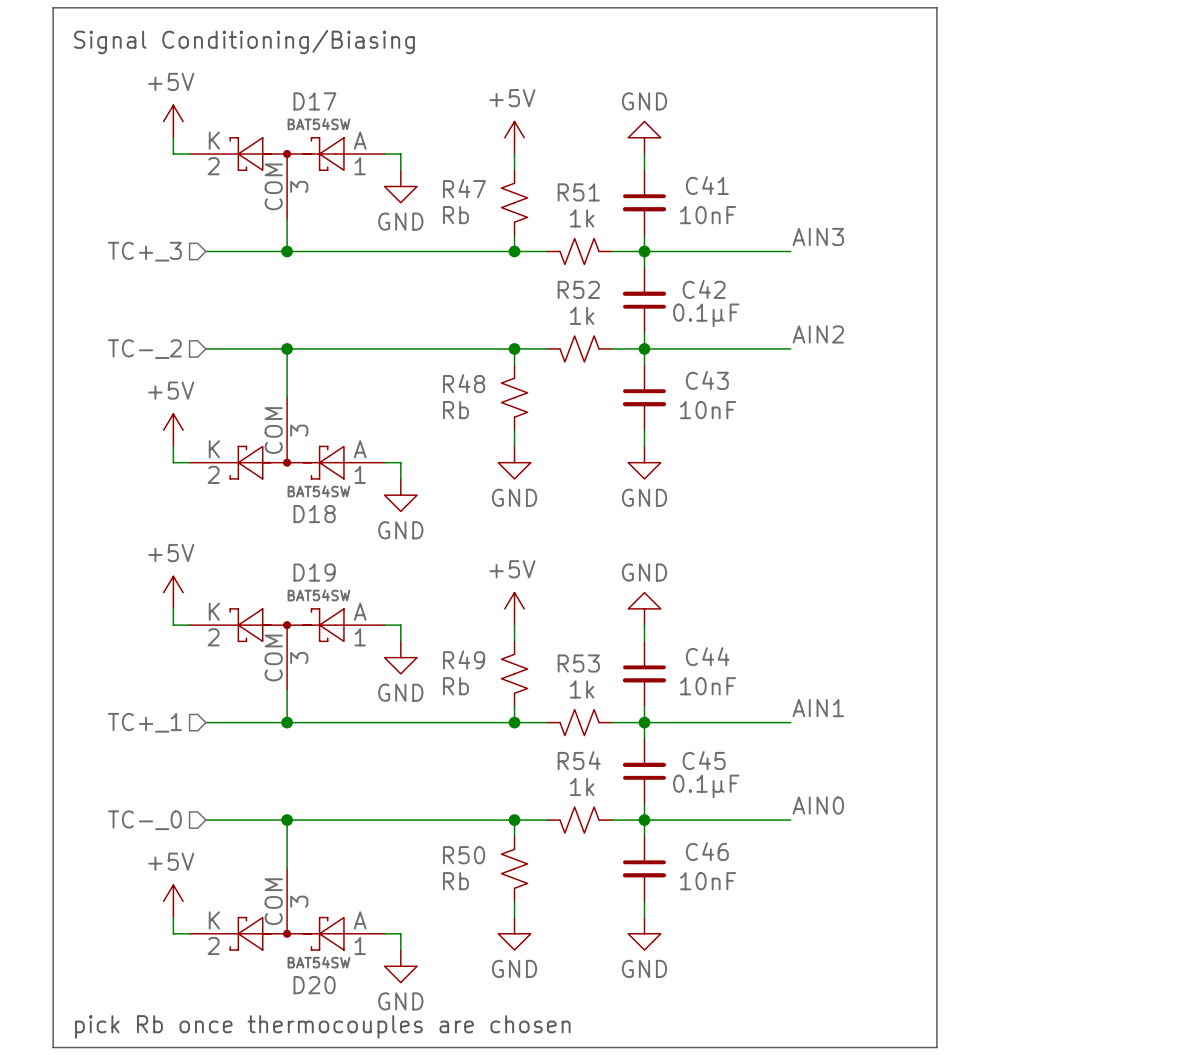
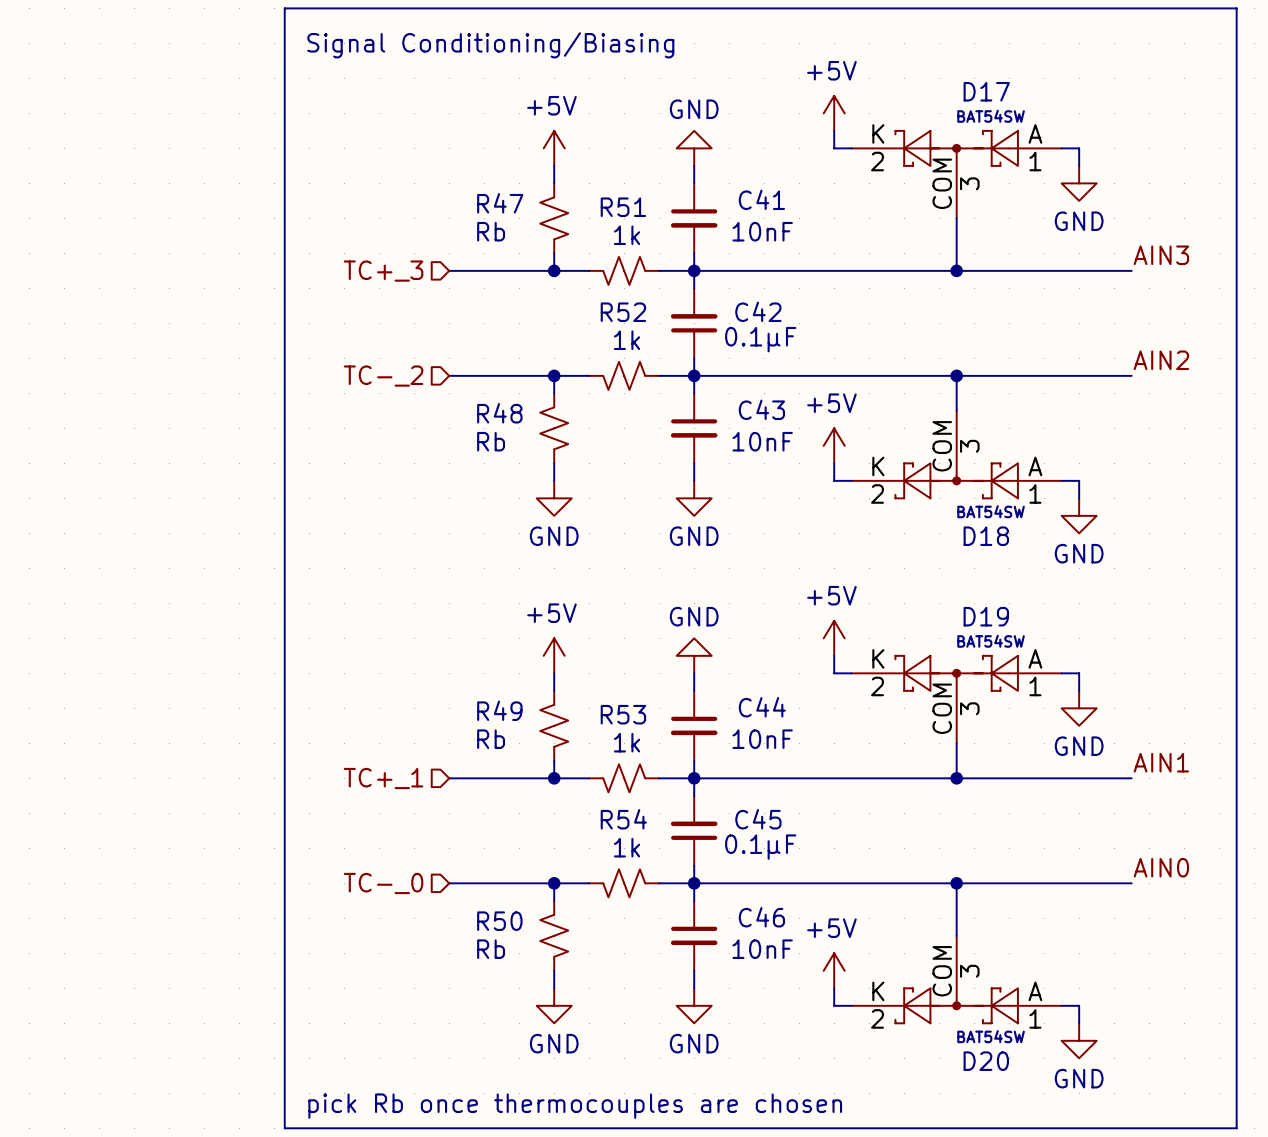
line: (264, 7) (53, 7) (53, 1047) (264, 1047) -> (284, 8) (284, 1128)
line: (936, 7) (936, 1047) -> (1009, 8) (1236, 8) (1236, 1128) (1009, 1128)
text position: Signal Conditioning/Biasing (244, 42) -> Signal Conditioning/Biasing (490, 45)
power symbol: none -> +5V (834, 113)
power symbol: +5V (173, 121) -> none
wire: none -> (834, 130) (834, 148) (851, 148)
wire: (173, 137) (173, 154) (189, 154) -> none
wire: none -> (1061, 148) (1079, 148) (1079, 165)
wire: (384, 154) (400, 154) (400, 170) -> none
power symbol: none -> GND (1079, 183)
D17 position: (287, 178) -> (956, 174)
power symbol: GND (400, 186) -> none
wire: none -> (956, 218) (956, 270)
wire: (287, 218) (287, 251) -> none
label position: AIN3 (818, 236) -> AIN3 (1161, 255)
hierarchical label position: TC+_3 (144, 251) -> TC+_3 (383, 271)
wire: (205, 251) (417, 251) -> none
junction: (287, 251) -> none
wire: none -> (851, 270) (1131, 270)
junction: none -> (956, 270)
label position: AIN2 (818, 334) -> AIN2 (1161, 360)
wire: (205, 348) (417, 348) -> none
wire: (287, 348) (287, 397) -> none
junction: (287, 348) -> none
wire: none -> (851, 375) (1131, 375)
wire: none -> (956, 375) (956, 410)
junction: none -> (956, 375)
hierarchical label position: TC-_2 (144, 349) -> TC-_2 (383, 376)
power symbol: none -> +5V (834, 445)
power symbol: +5V (173, 430) -> none
wire: none -> (834, 463) (834, 480) (851, 480)
D18 position: (287, 438) -> (956, 454)
wire: (173, 446) (173, 462) (189, 462) -> none
wire: none -> (1061, 480) (1079, 480) (1079, 498)
wire: (384, 462) (400, 462) (400, 478) -> none
power symbol: none -> GND (1079, 515)
power symbol: GND (400, 495) -> none
power symbol: +5V (173, 592) -> none
power symbol: none -> +5V (834, 638)
wire: (173, 608) (173, 625) (189, 625) -> none
wire: none -> (834, 655) (834, 673) (851, 673)
wire: (384, 625) (400, 625) (400, 641) -> none
wire: none -> (1061, 673) (1079, 673) (1079, 690)
D19 position: (287, 649) -> (956, 699)
power symbol: GND (400, 657) -> none
power symbol: none -> GND (1079, 708)
wire: (287, 690) (287, 722) -> none
wire: none -> (956, 743) (956, 778)
label position: AIN1 (818, 708) -> AIN1 (1161, 762)
hierarchical label position: TC+_1 (144, 722) -> TC+_1 (383, 778)
wire: (205, 722) (417, 722) -> none
junction: (287, 722) -> none
wire: none -> (851, 778) (1131, 778)
junction: none -> (956, 778)
label position: AIN0 (818, 805) -> AIN0 (1161, 867)
hierarchical label position: TC-_0 (144, 820) -> TC-_0 (383, 883)
wire: (205, 820) (417, 820) -> none
wire: (287, 820) (287, 868) -> none
junction: (287, 820) -> none
wire: none -> (851, 883) (1131, 883)
wire: none -> (956, 883) (956, 935)
junction: none -> (956, 883)
power symbol: +5V (173, 901) -> none
power symbol: none -> +5V (834, 970)
D20 position: (287, 909) -> (956, 979)
wire: (173, 917) (173, 933) (189, 933) -> none
wire: none -> (834, 988) (834, 1005) (851, 1005)
wire: (384, 933) (400, 933) (400, 950) -> none
wire: none -> (1061, 1005) (1079, 1005) (1079, 1023)
power symbol: GND (400, 966) -> none
power symbol: none -> GND (1079, 1040)
text position: pick Rb once thermocouples are chosen (322, 1026) -> pick Rb once thermocouples are chosen (575, 1106)

